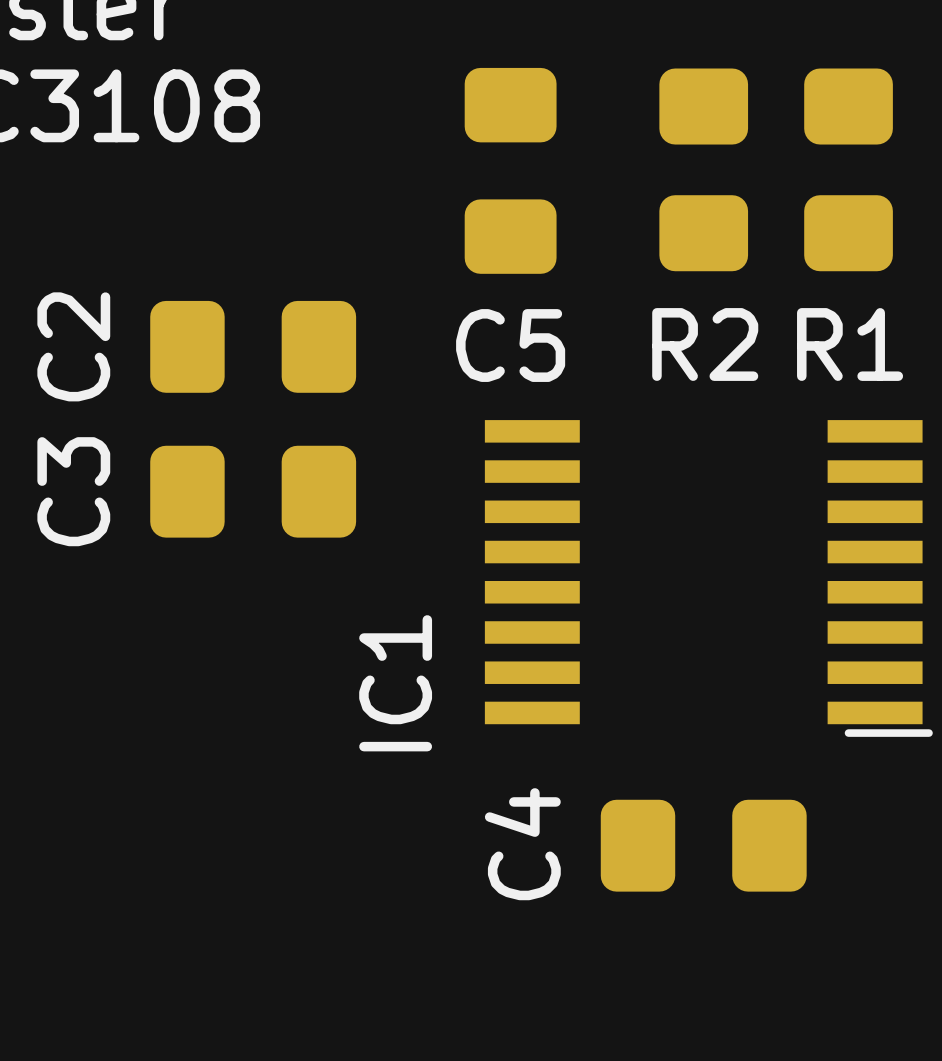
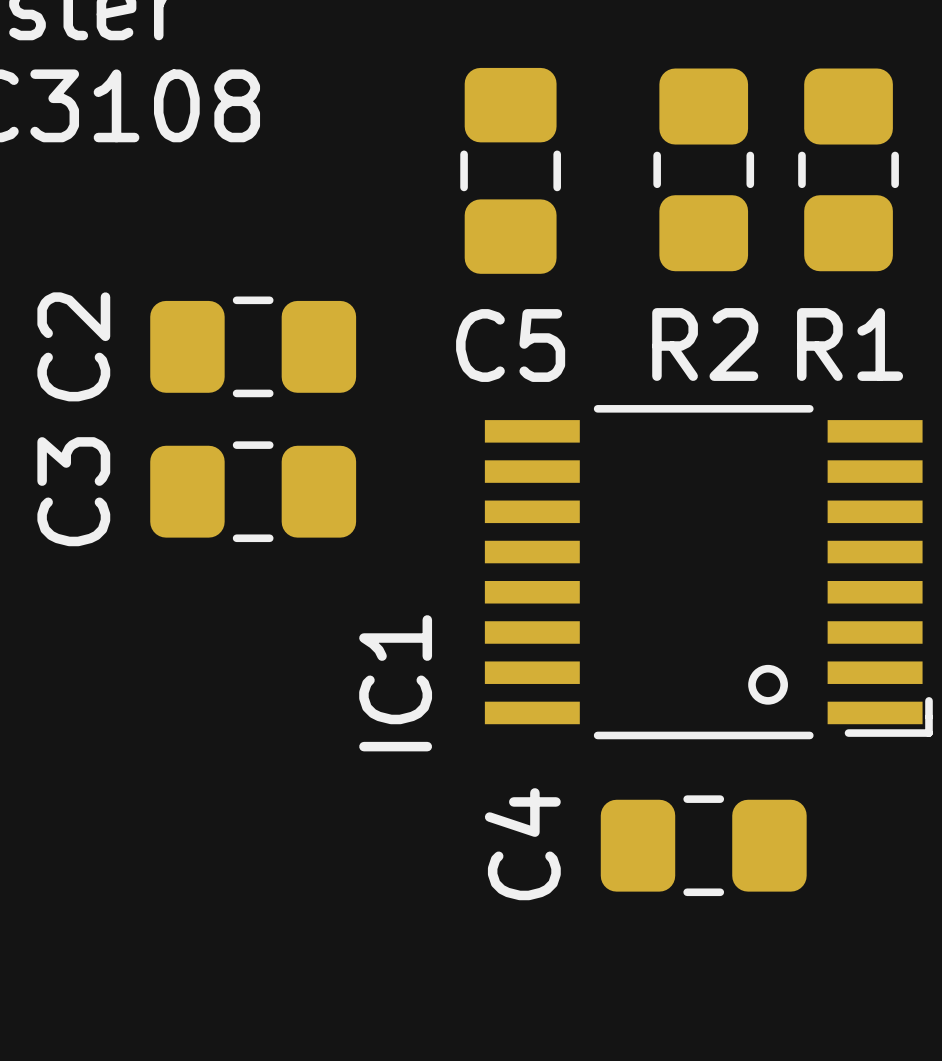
C5 footprint: [464, 67, 557, 274] -> [460, 67, 561, 274]
R2 footprint: [659, 68, 749, 272] -> [653, 68, 755, 272]
R1 footprint: [804, 68, 893, 272] -> [798, 68, 899, 272]
C2 footprint: [150, 300, 357, 393] -> [150, 296, 357, 398]
IC1 footprint: [484, 420, 933, 737] -> [484, 405, 933, 740]
C3 footprint: [150, 445, 357, 538] -> [150, 441, 357, 543]
C4 footprint: [600, 799, 807, 892] -> [600, 795, 807, 897]

